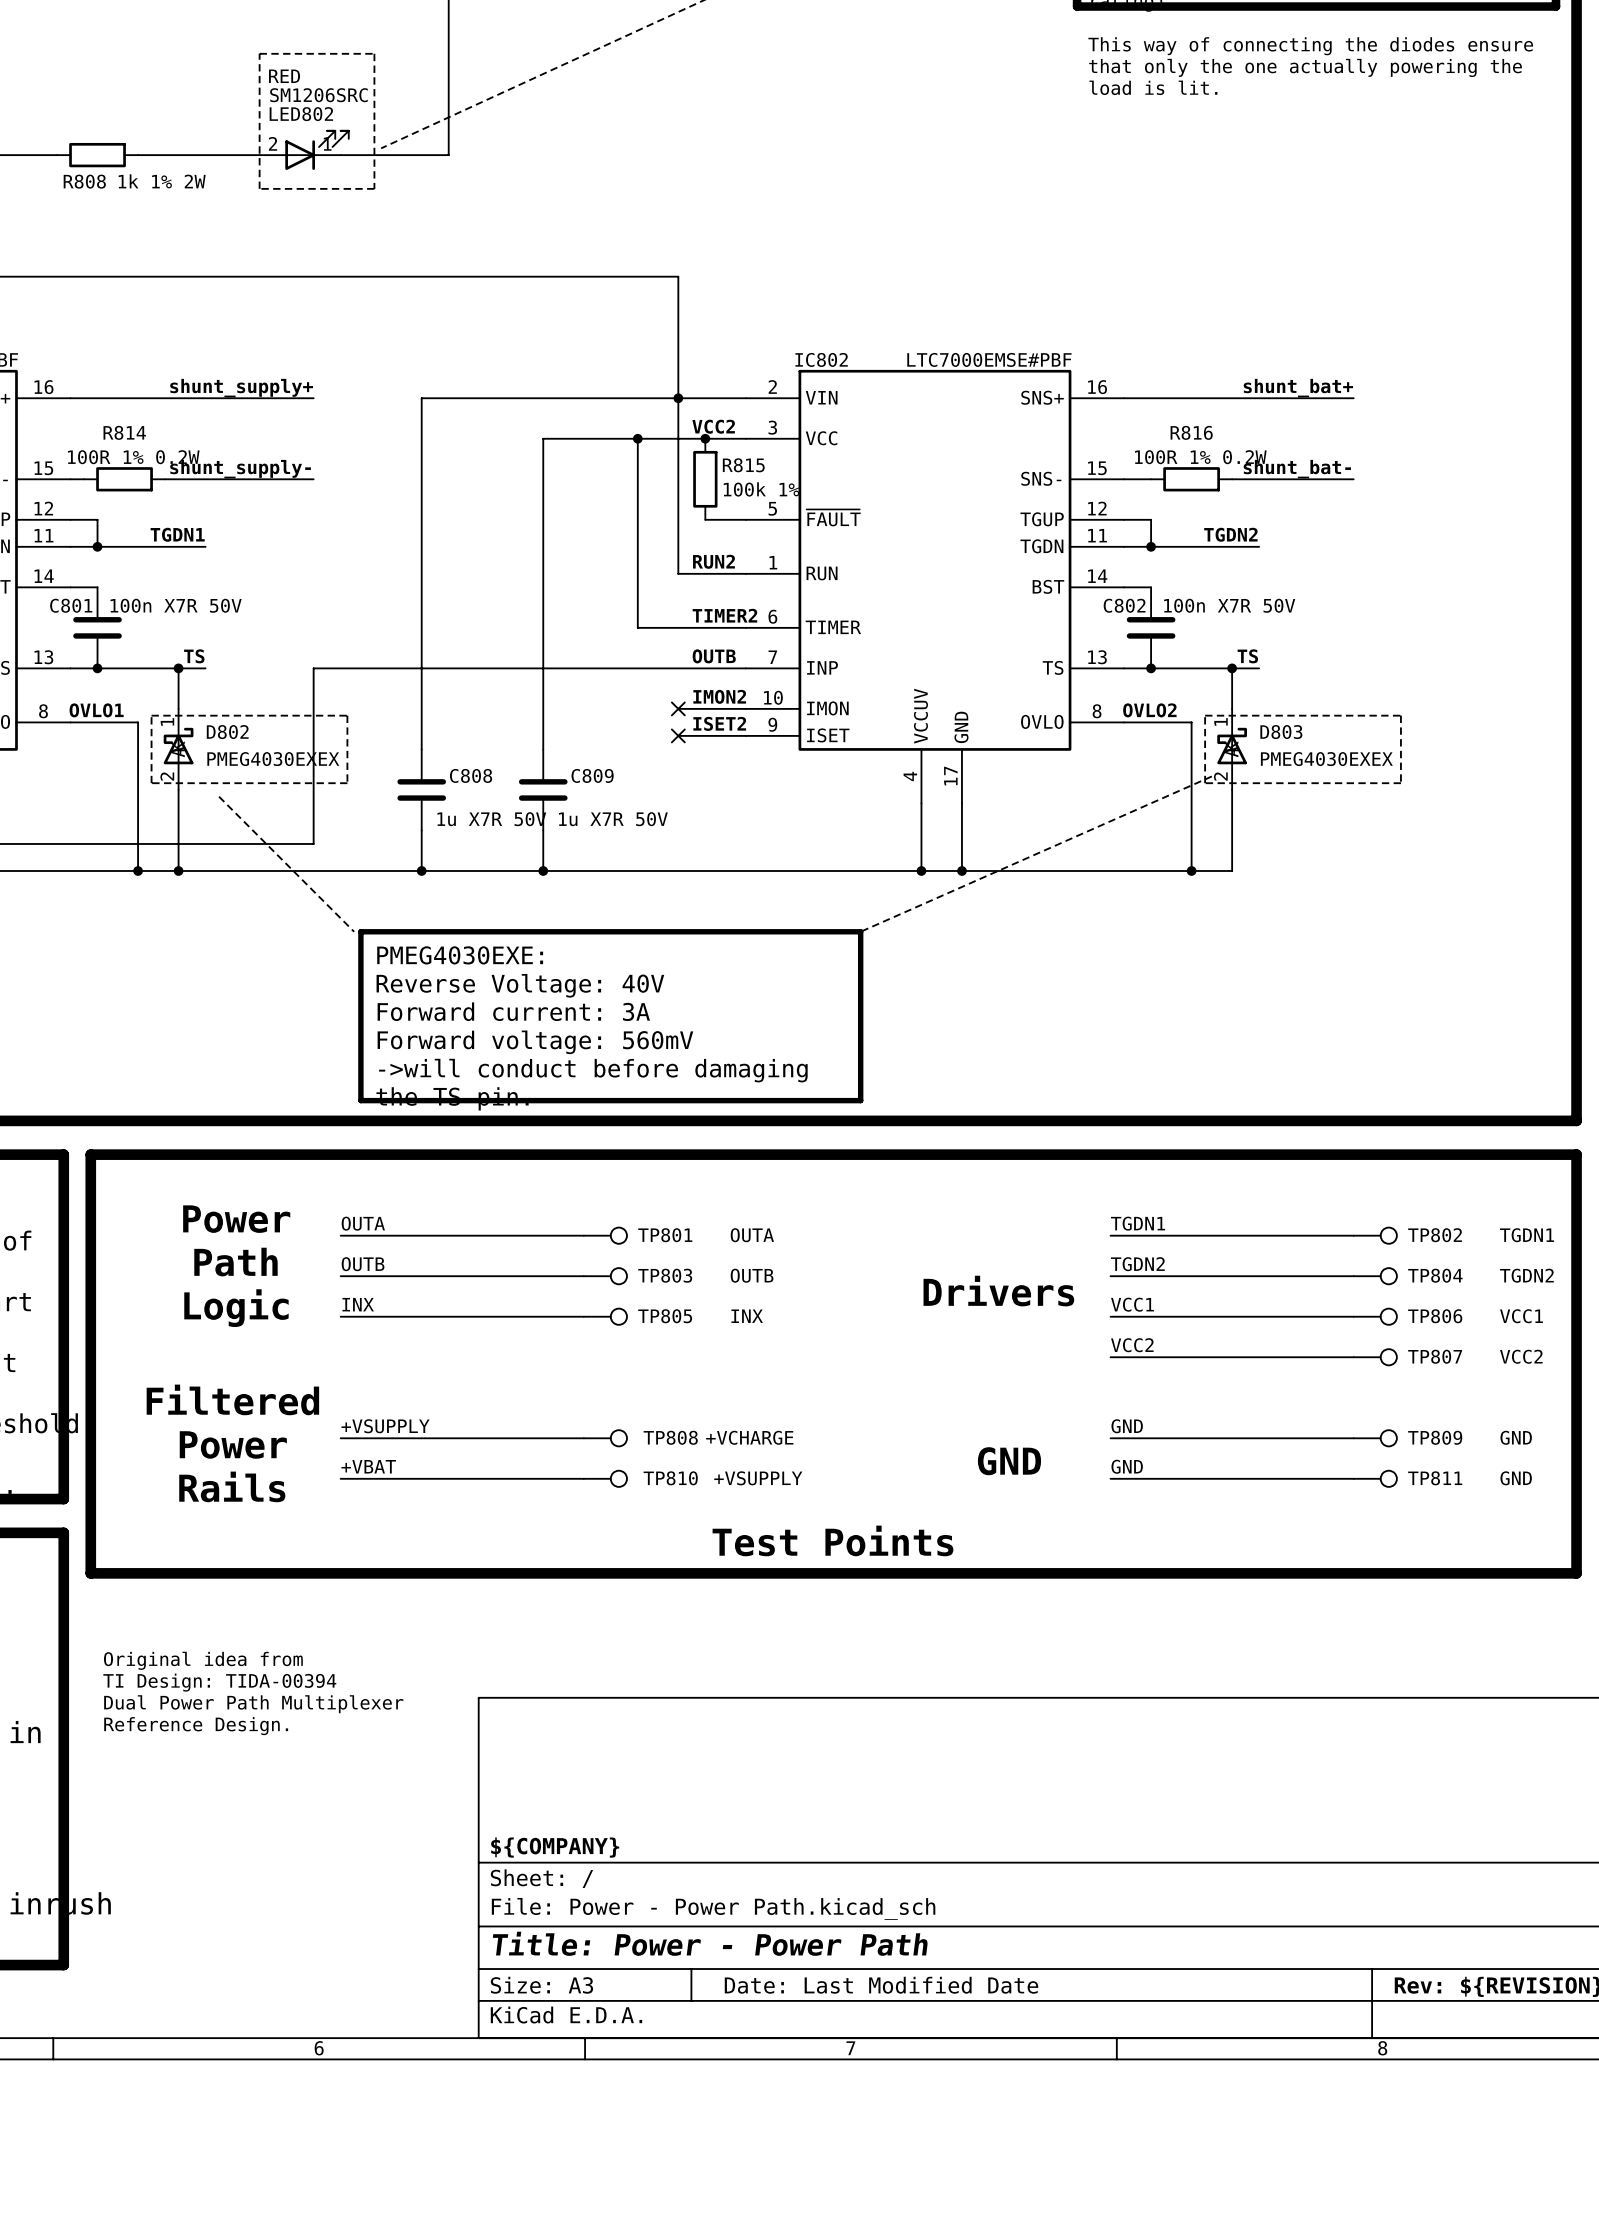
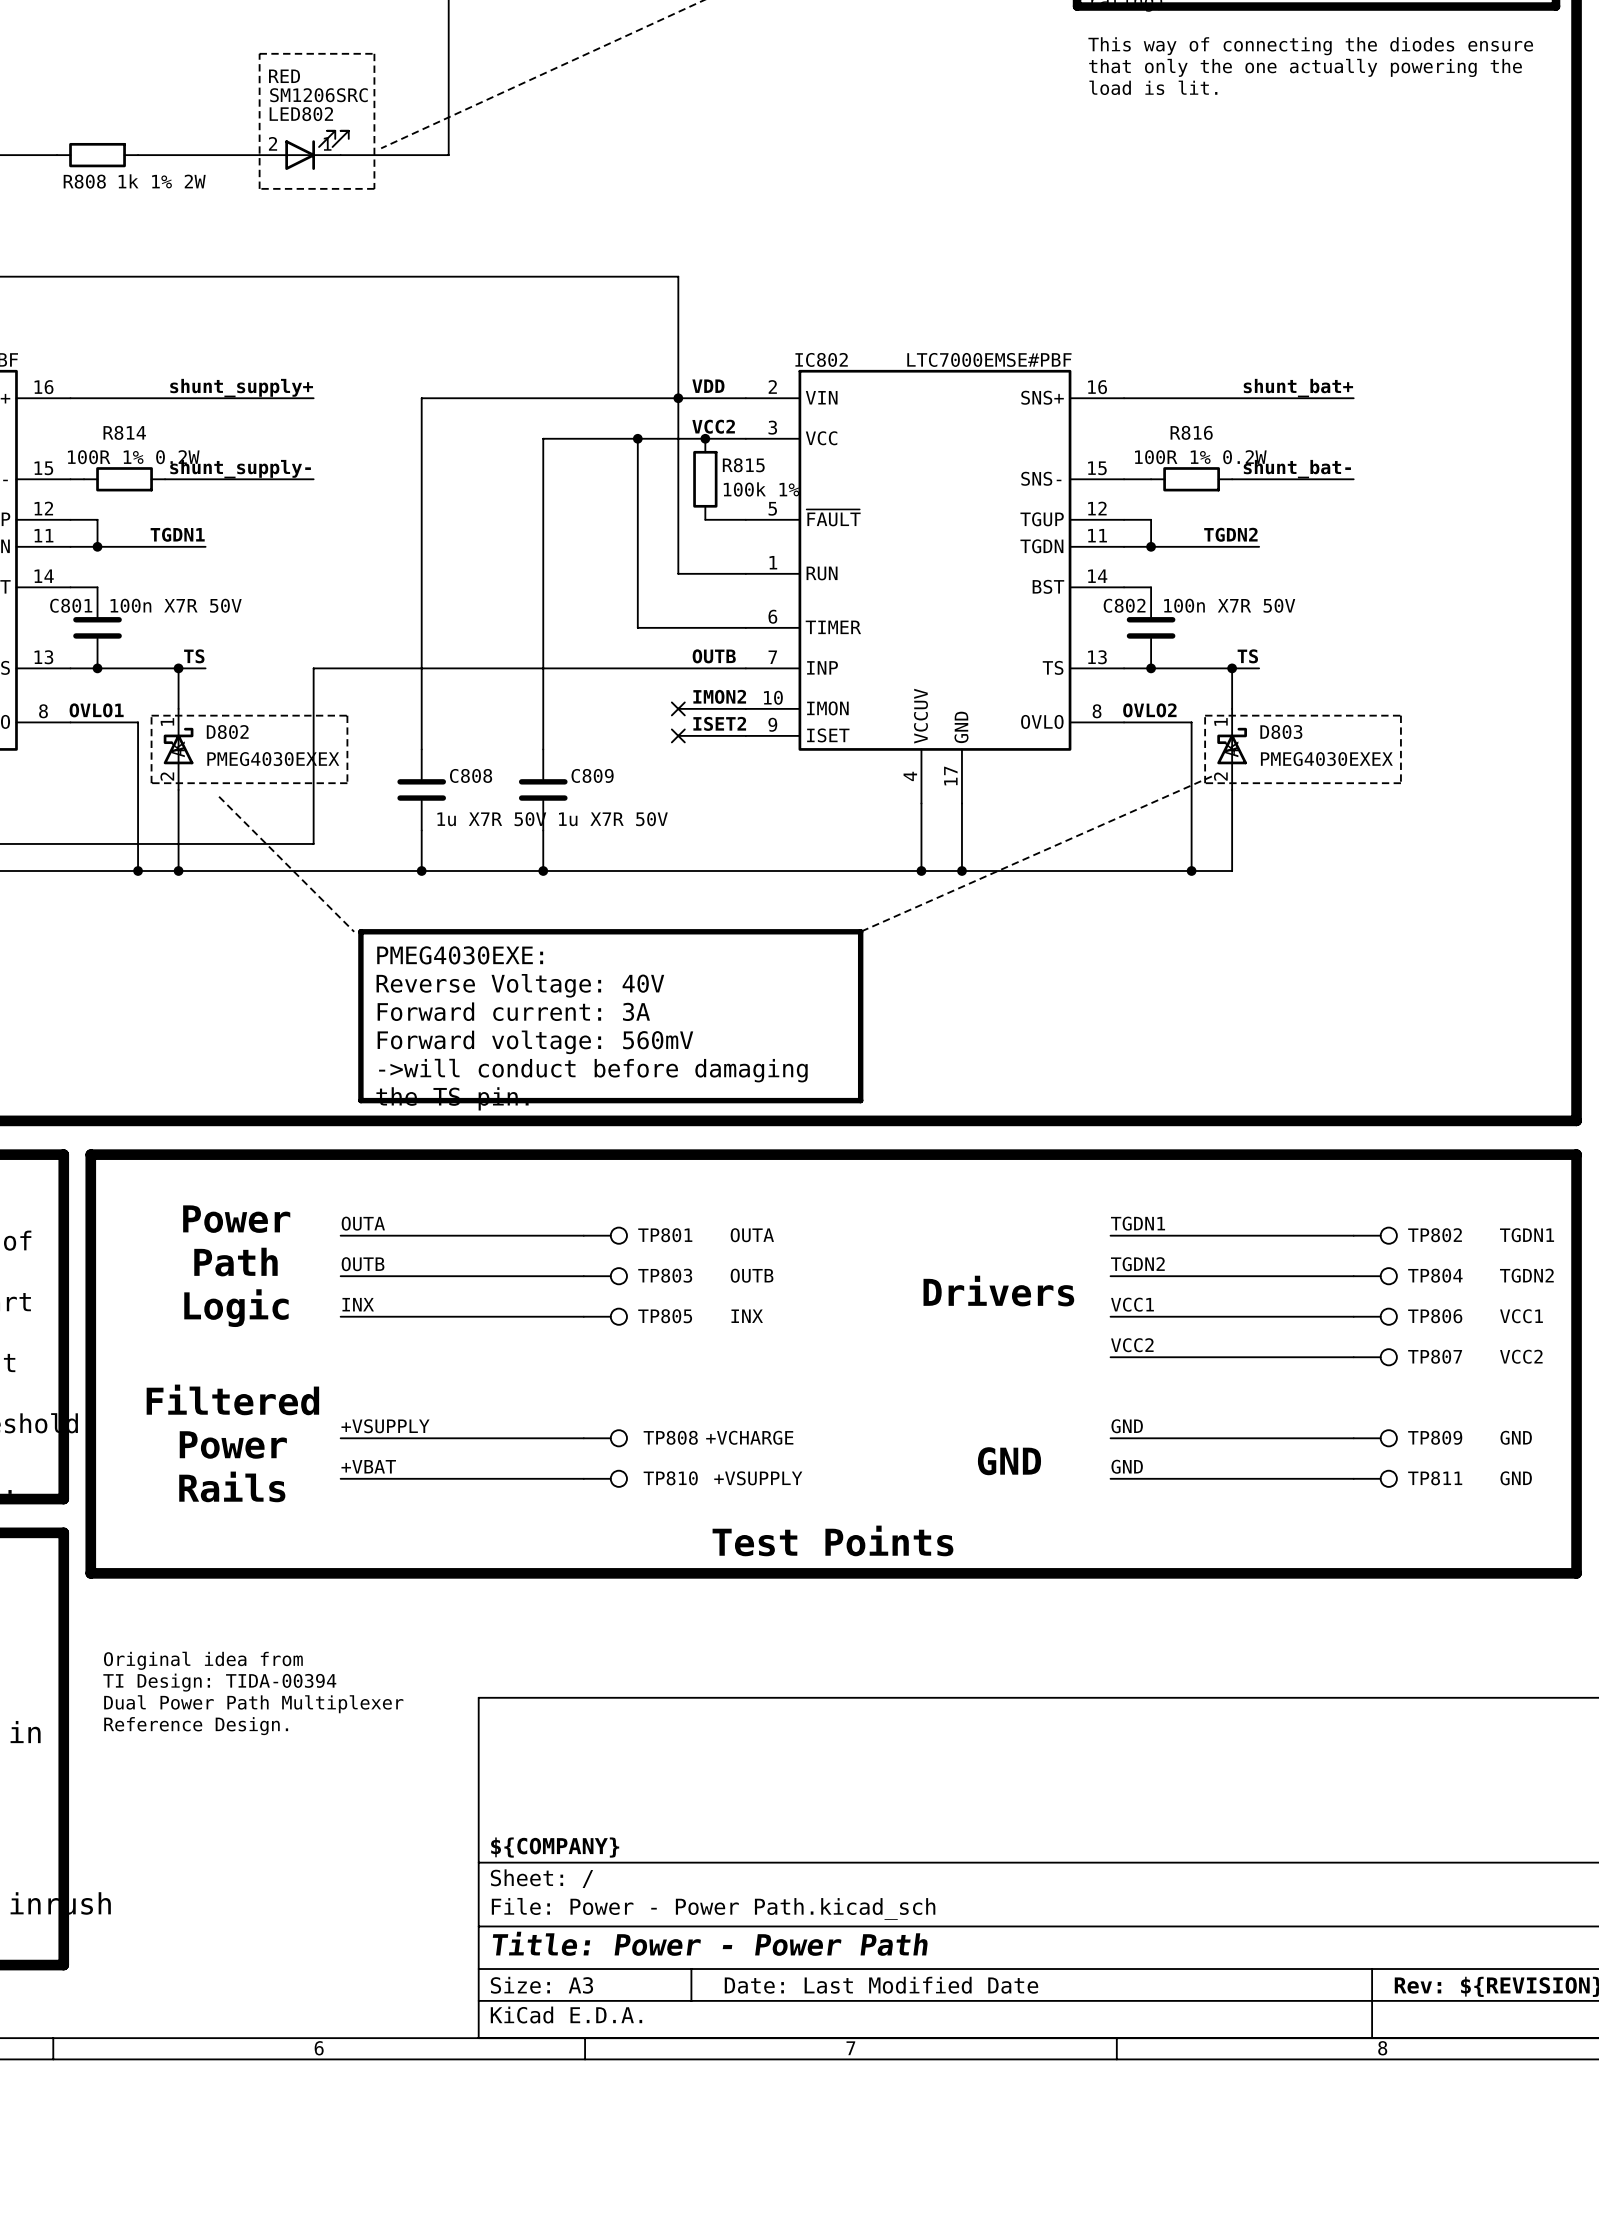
label: none -> VDD (708, 386)
label: RUN2 (713, 561) -> none
label: TIMER2 (724, 615) -> none

